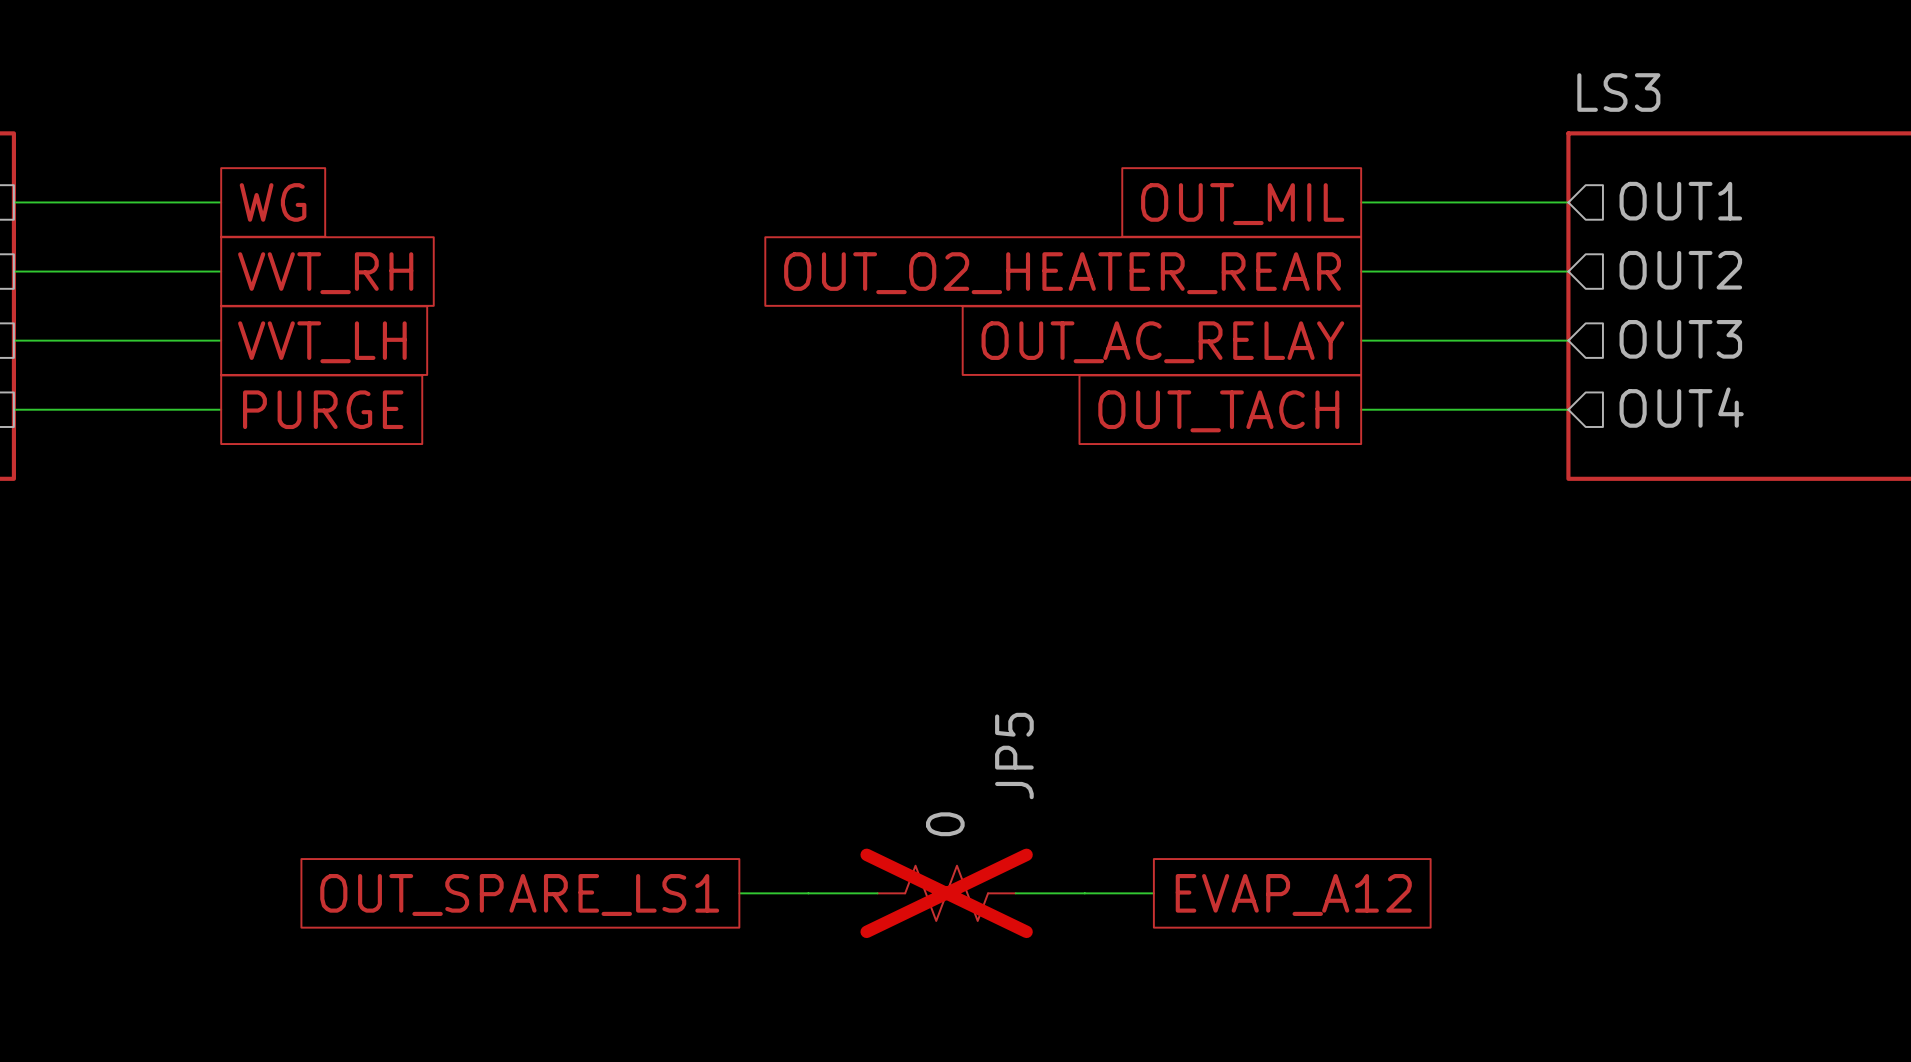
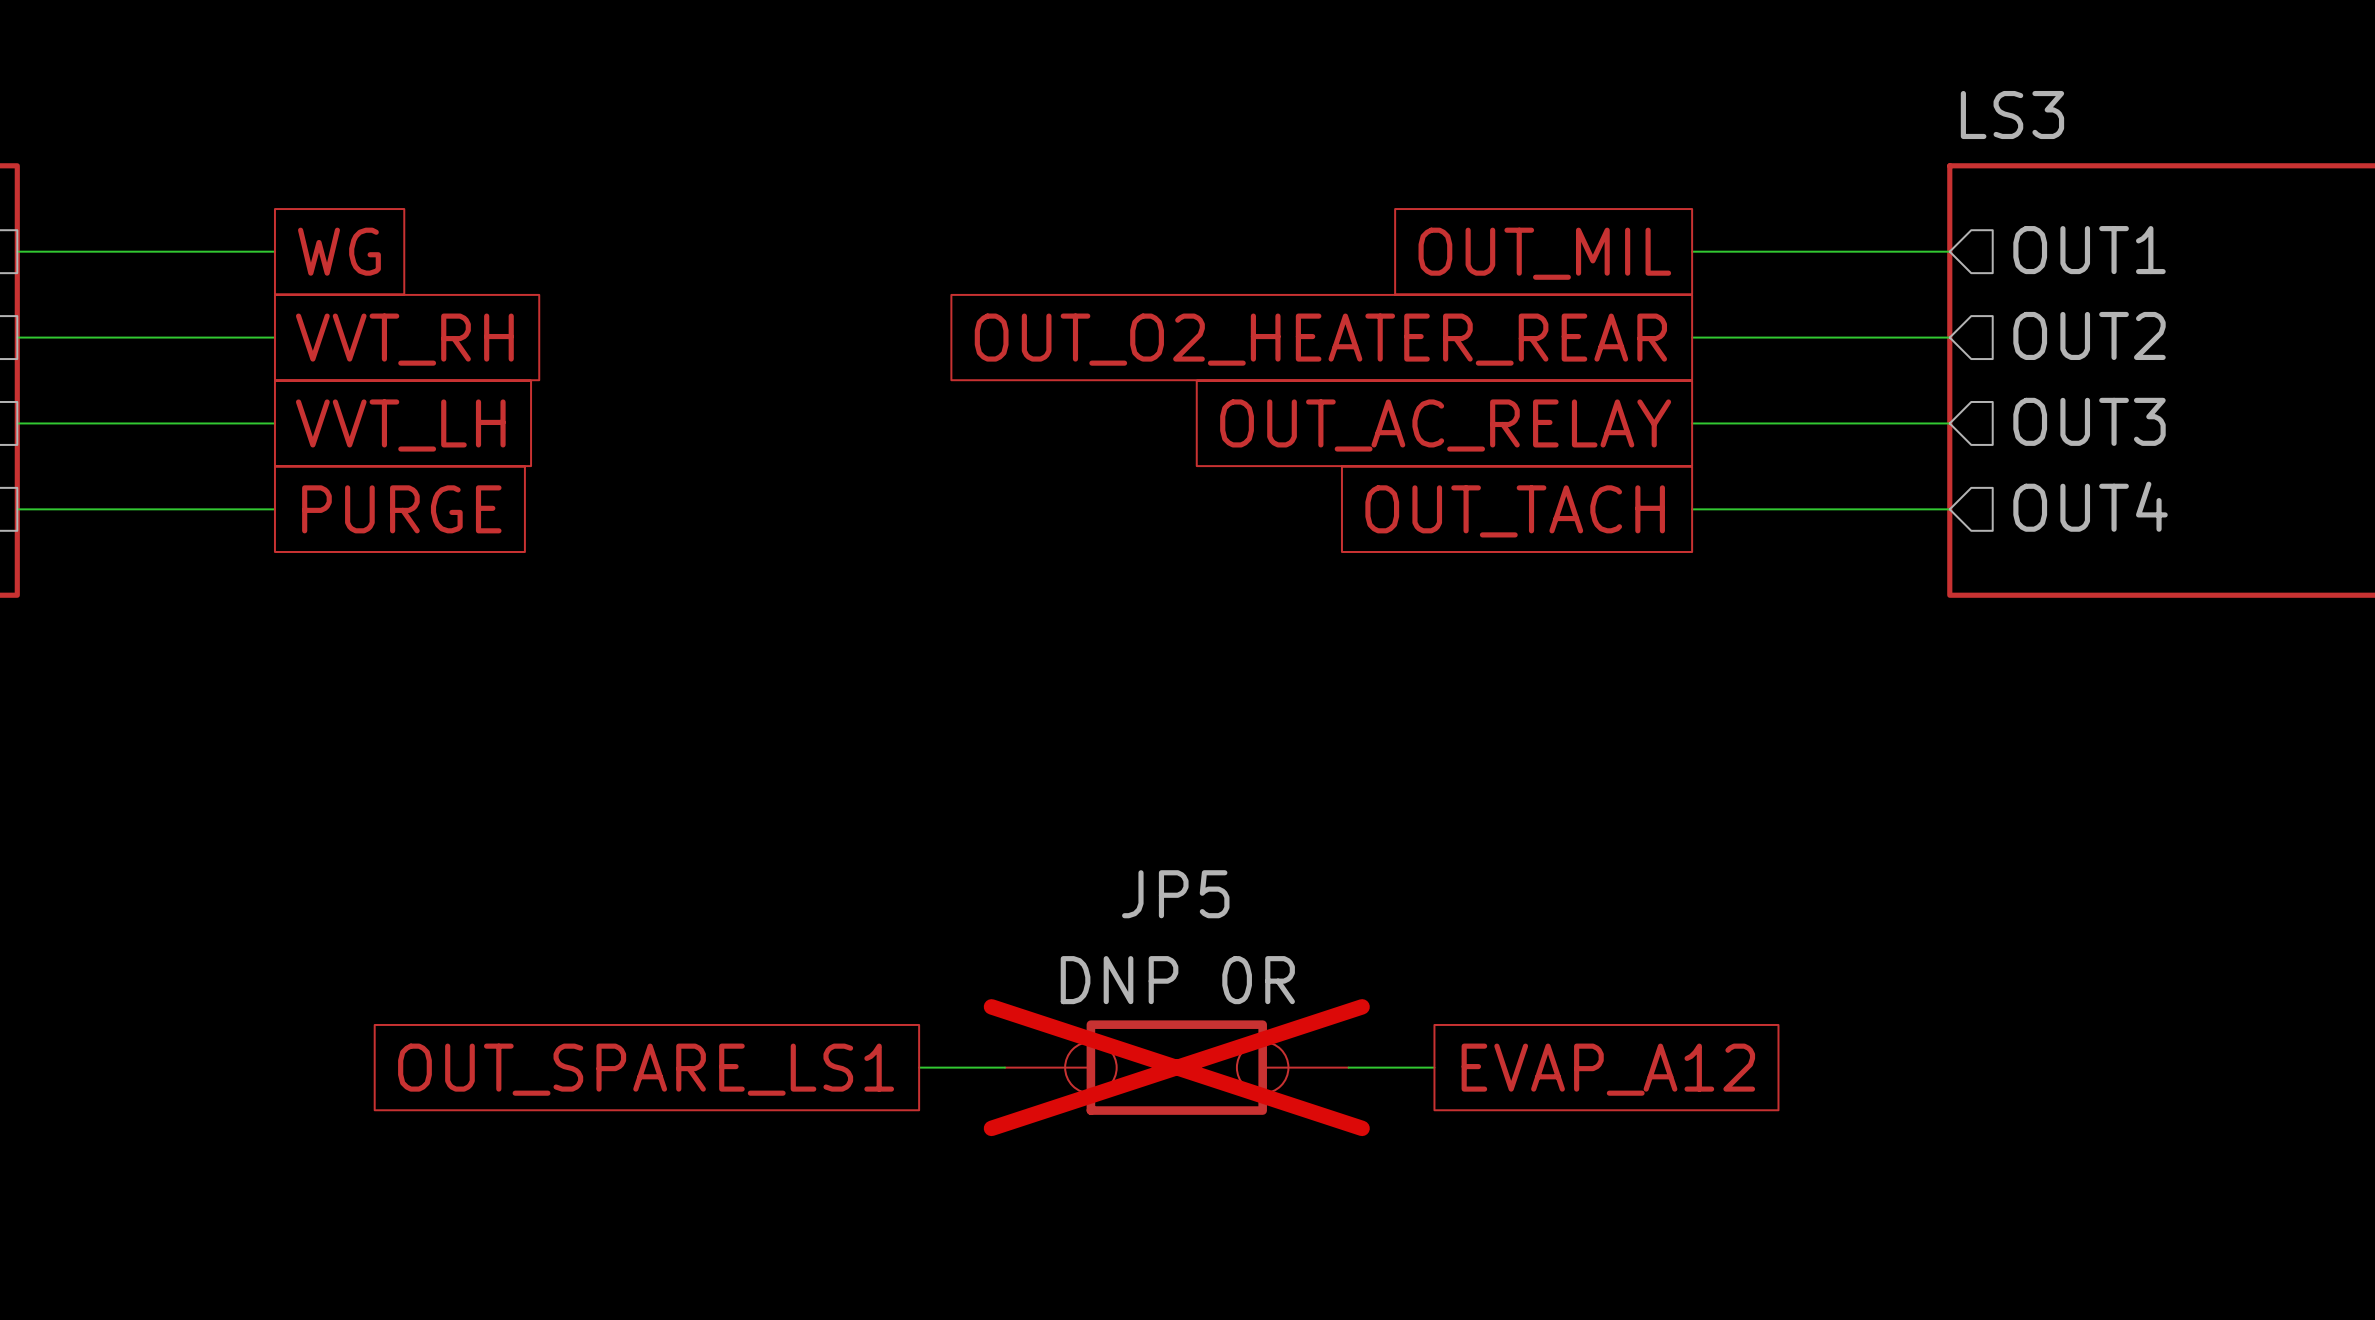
JP5 name position: JP5 (1014, 755) -> JP5 (1175, 894)
JP5 value: 0 (945, 824) -> DNP 0R (1177, 980)
wire: none -> (919, 1067) (1005, 1067)
wire: none -> (1348, 1067) (1434, 1067)
JP5 symbol: [877, 865, 1016, 921] -> [1005, 1020, 1349, 1115]
wire: (739, 893) (877, 893) -> none
wire: (1015, 893) (1153, 893) -> none
global label position: OUT_SPARE_LS1 (519, 894) -> OUT_SPARE_LS1 (646, 1069)
global label position: EVAP_A12 (1293, 894) -> EVAP_A12 (1608, 1069)

